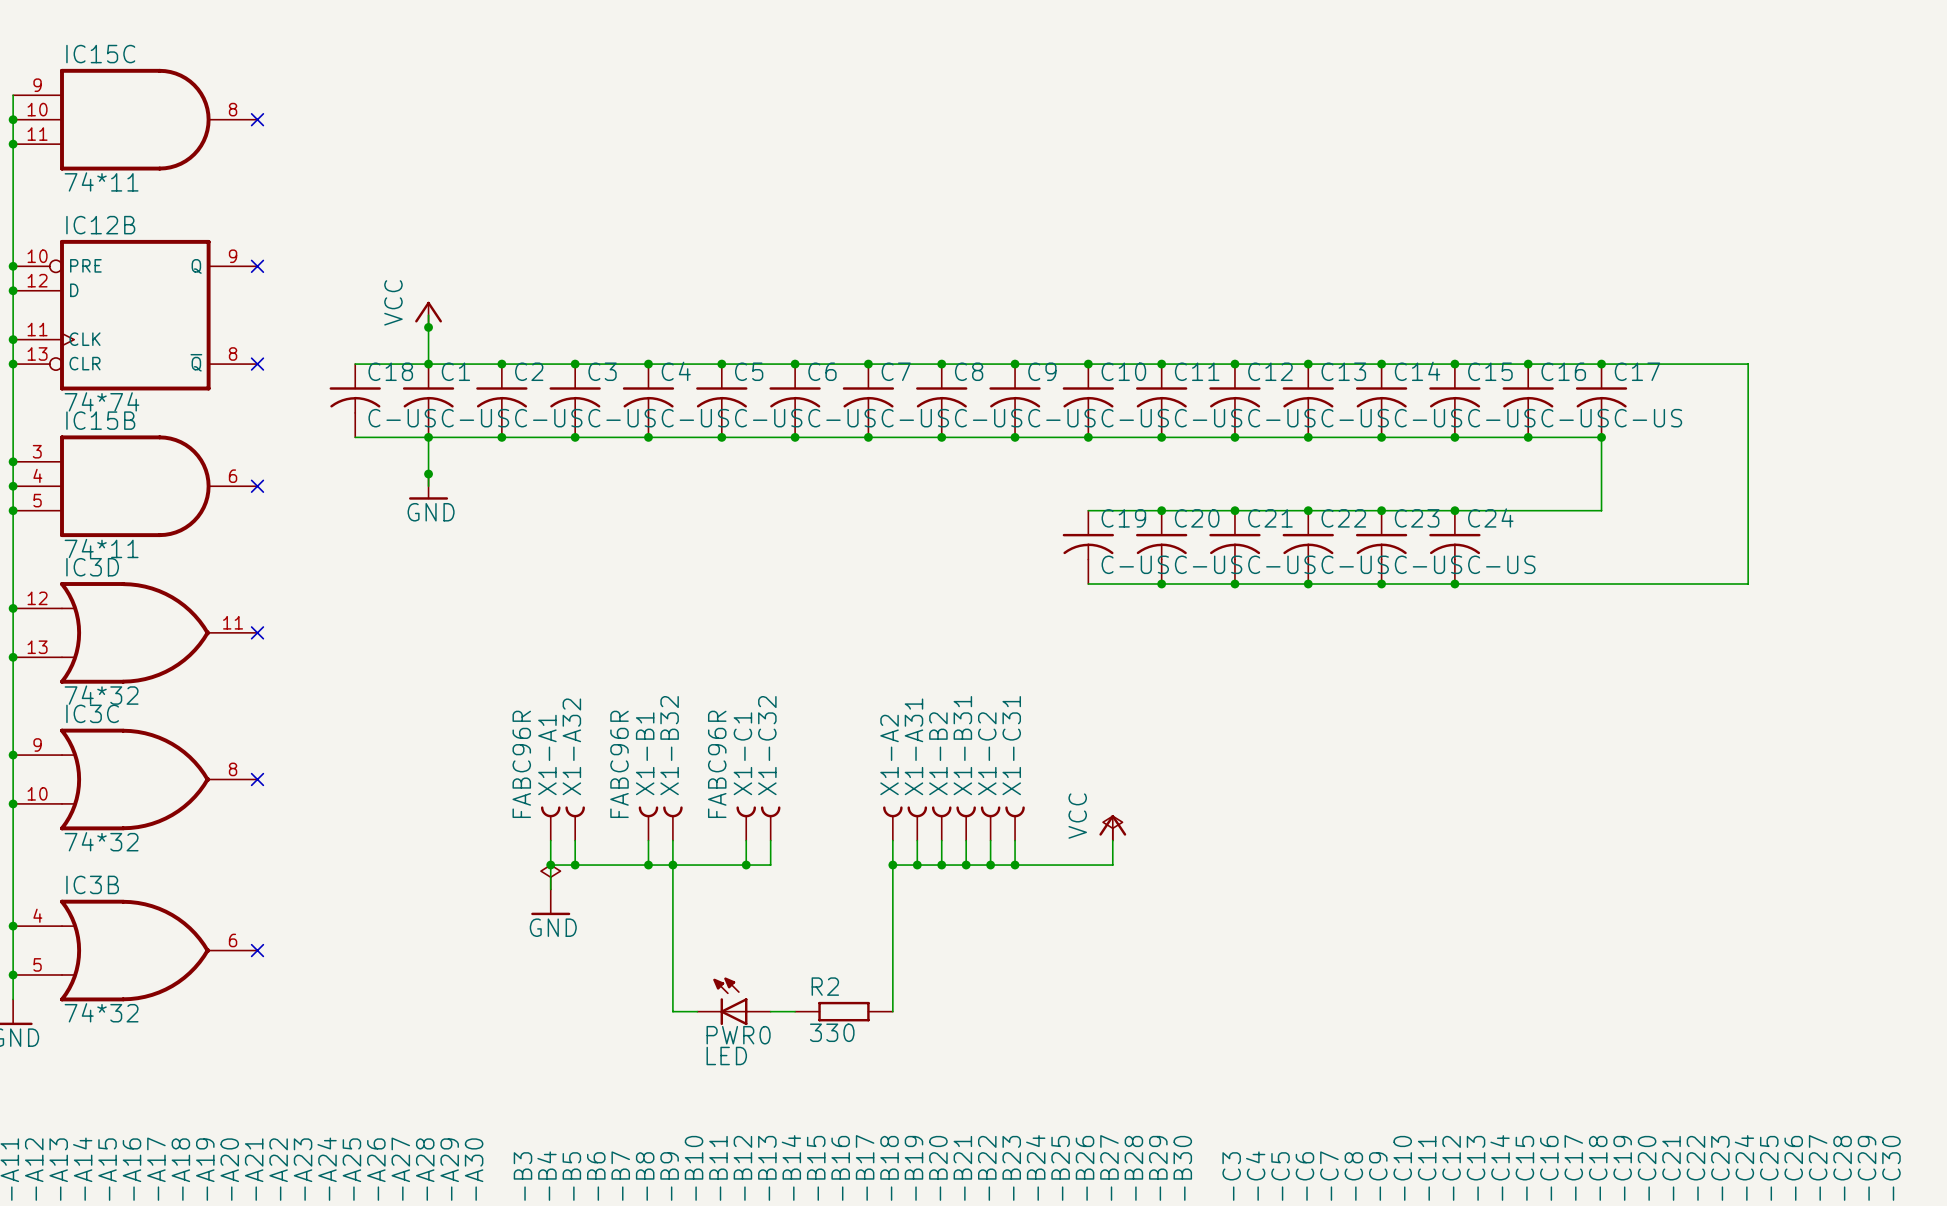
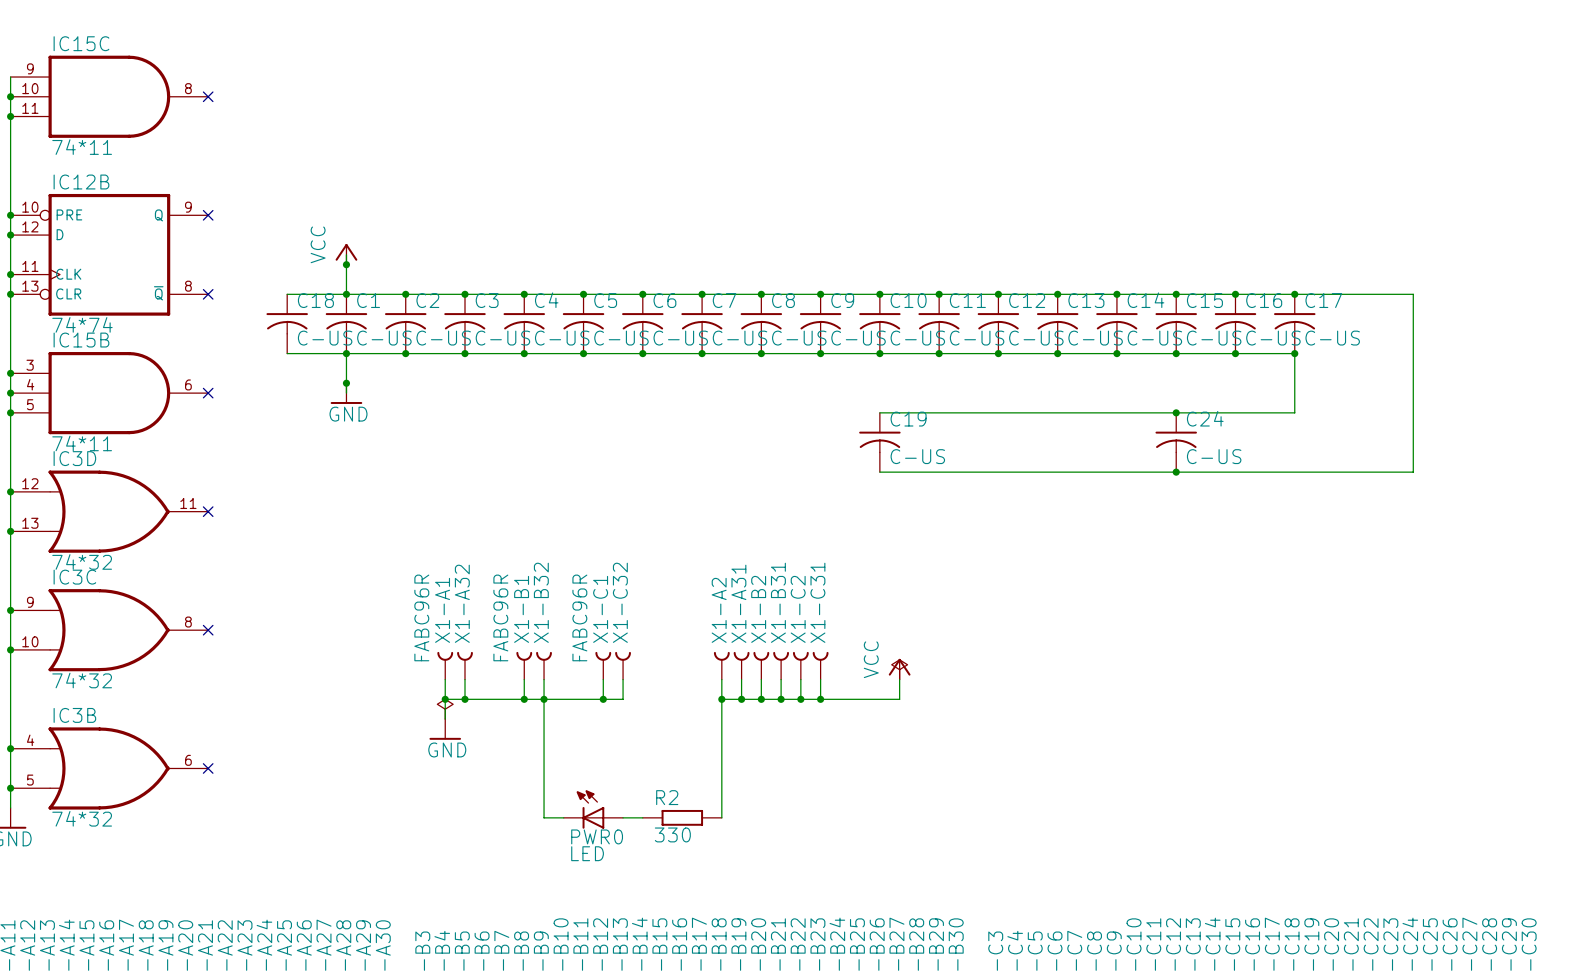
junction: (1161, 510) -> none
junction: (1234, 510) -> none
junction: (1308, 510) -> none
junction: (1381, 510) -> none
C20: C-US (1161, 547) -> none
C21: C-US (1234, 547) -> none
C22: C-US (1308, 547) -> none
C23: C-US (1381, 547) -> none
junction: (1161, 584) -> none
junction: (1234, 584) -> none
junction: (1308, 584) -> none
junction: (1381, 584) -> none

